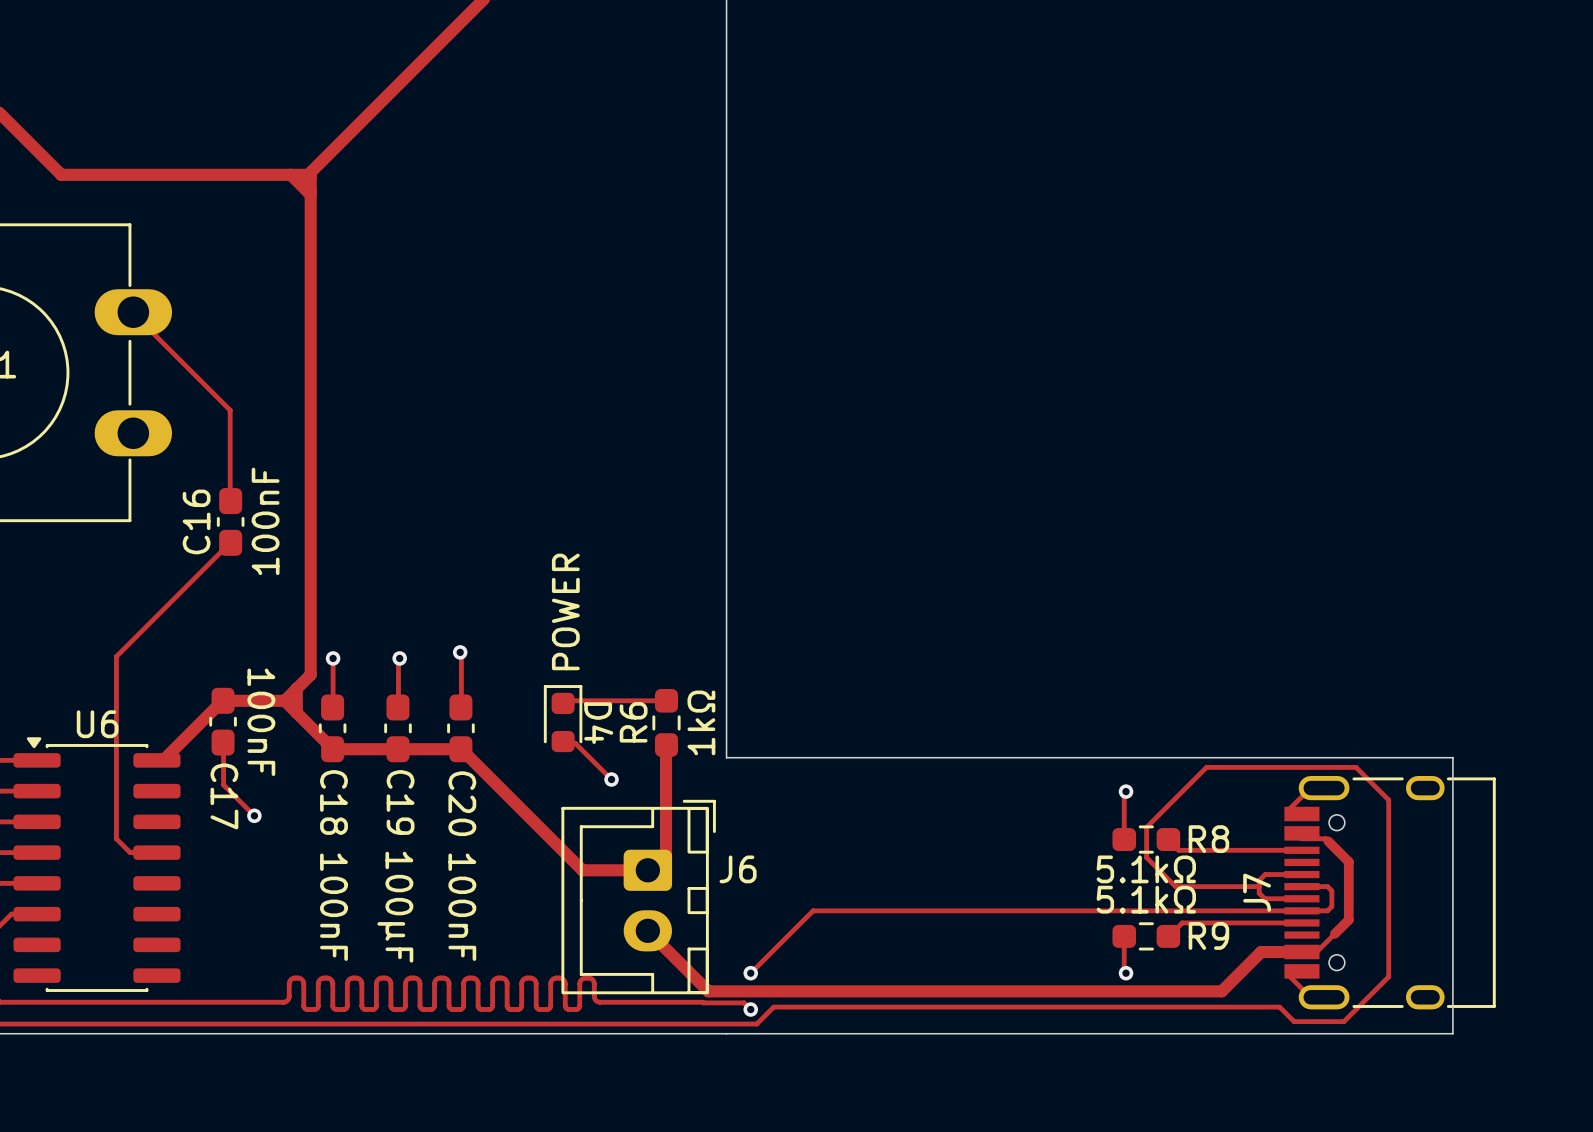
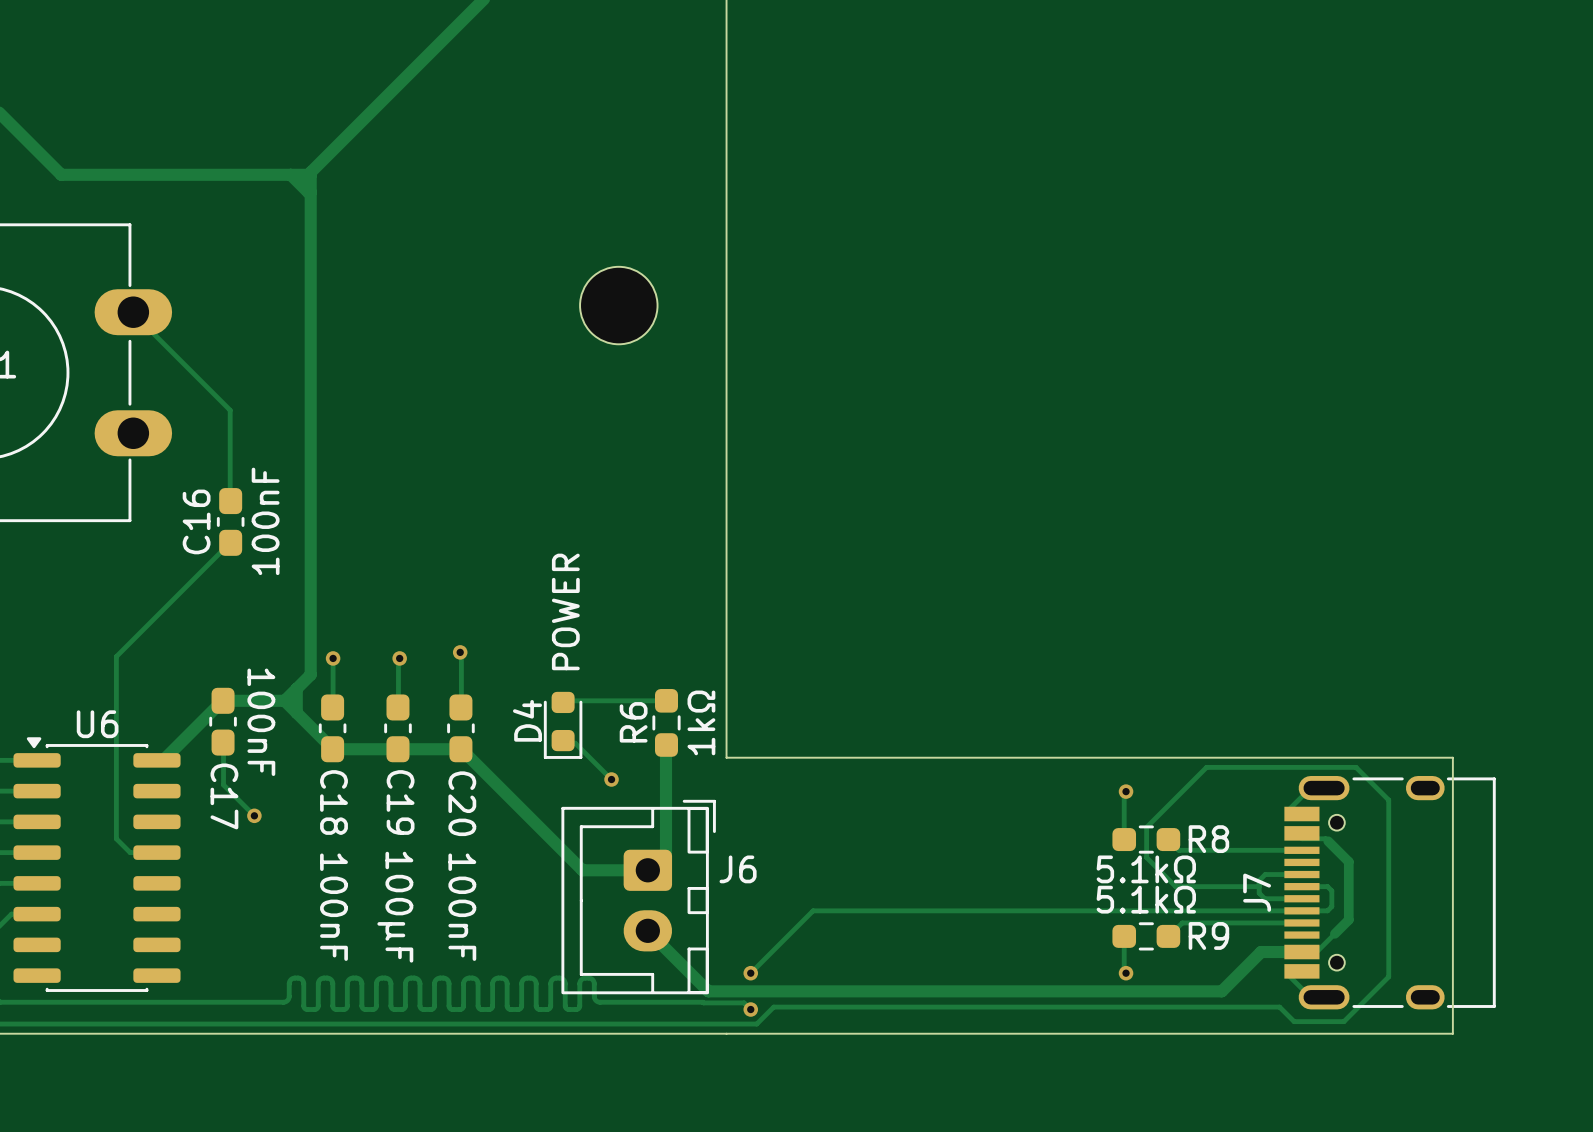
part: none -> (618, 305)
D4 rotation: 0° (563, 718) -> 180° (563, 725)

